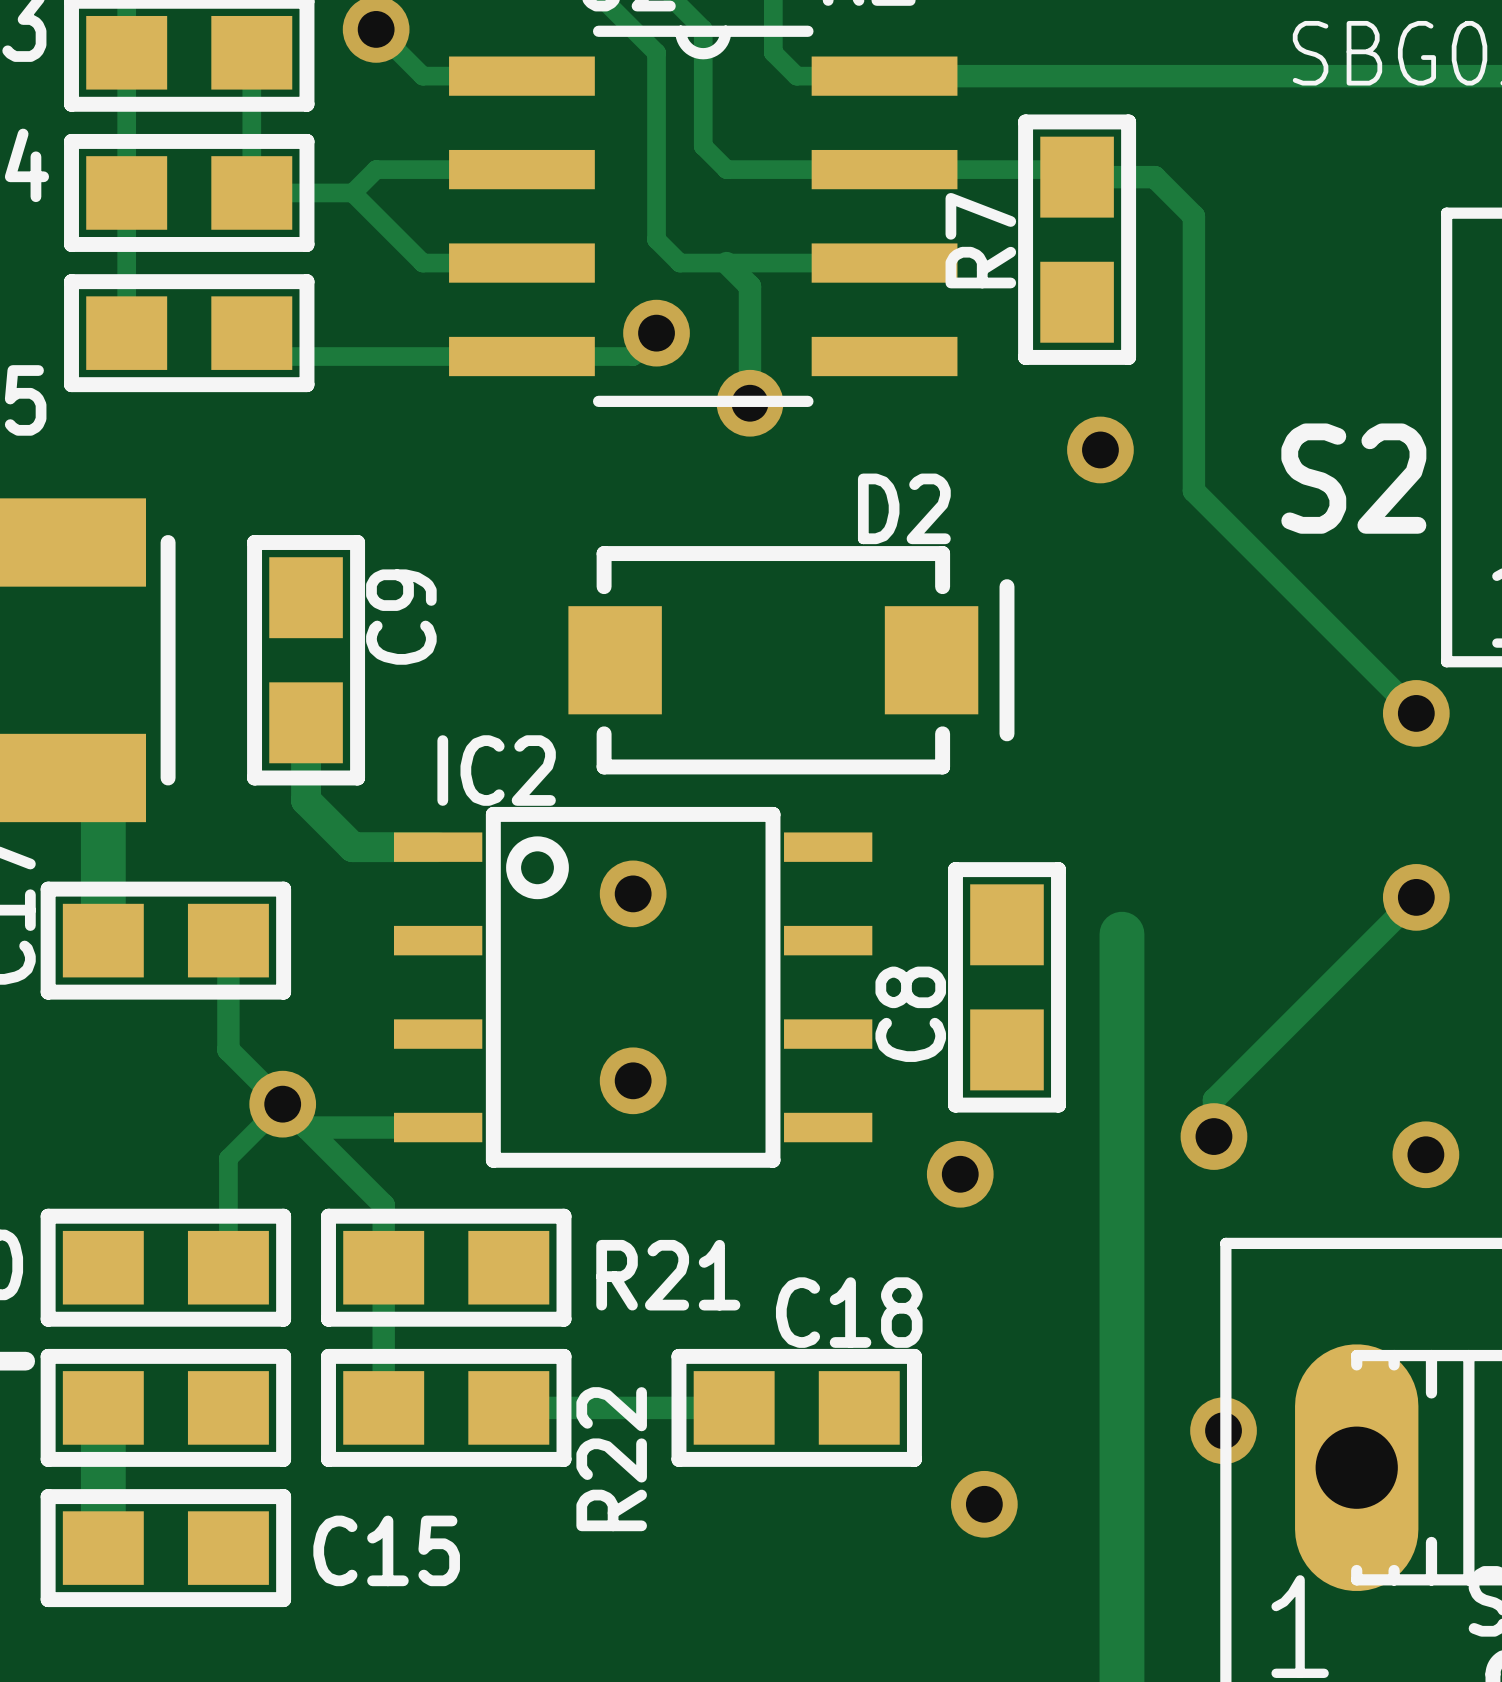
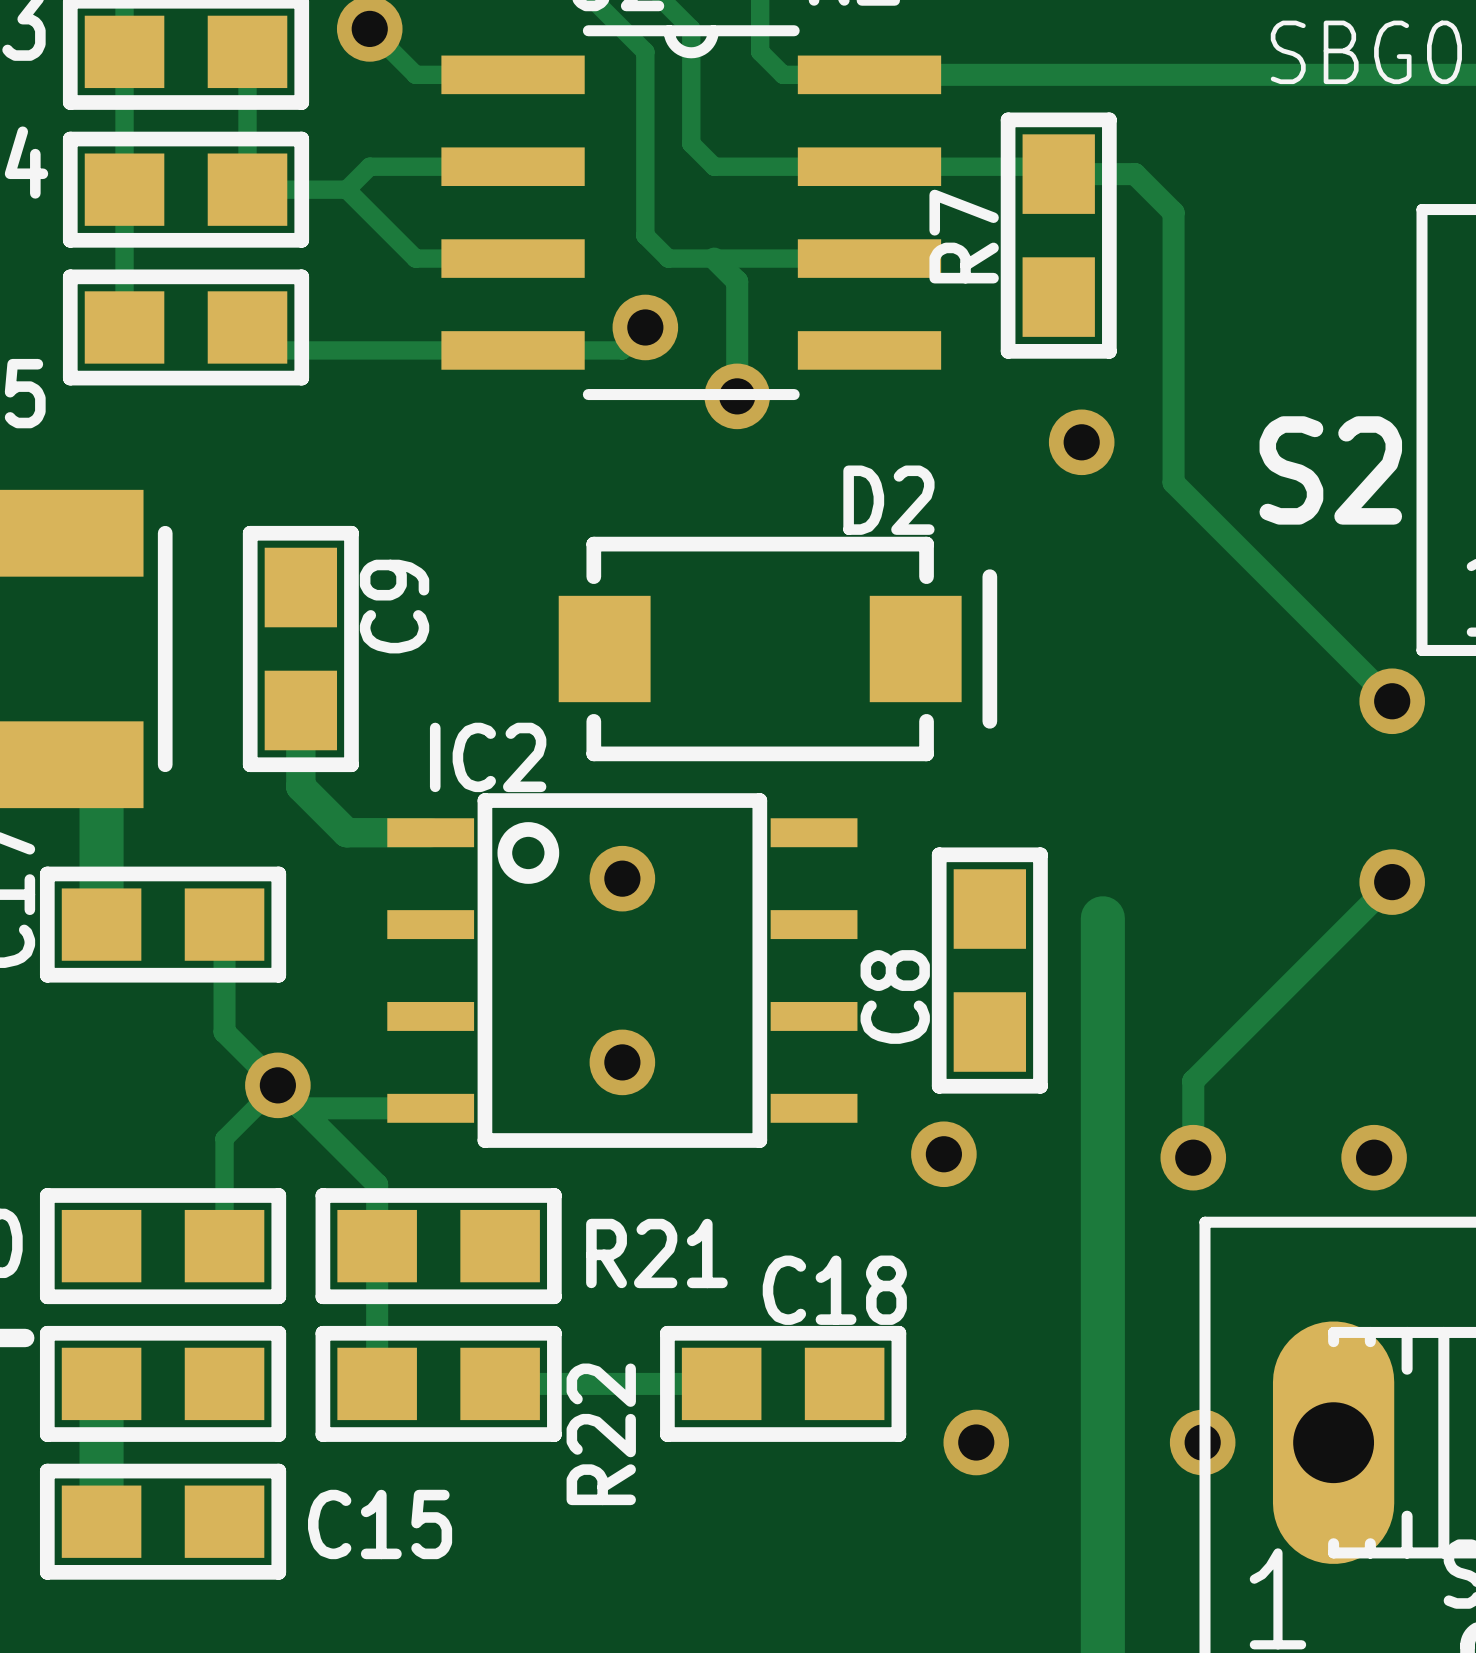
via position: (1213, 1136) -> (1193, 1157)
via position: (1425, 1154) -> (1374, 1157)
via position: (1223, 1430) -> (1202, 1442)
via position: (984, 1504) -> (976, 1442)

